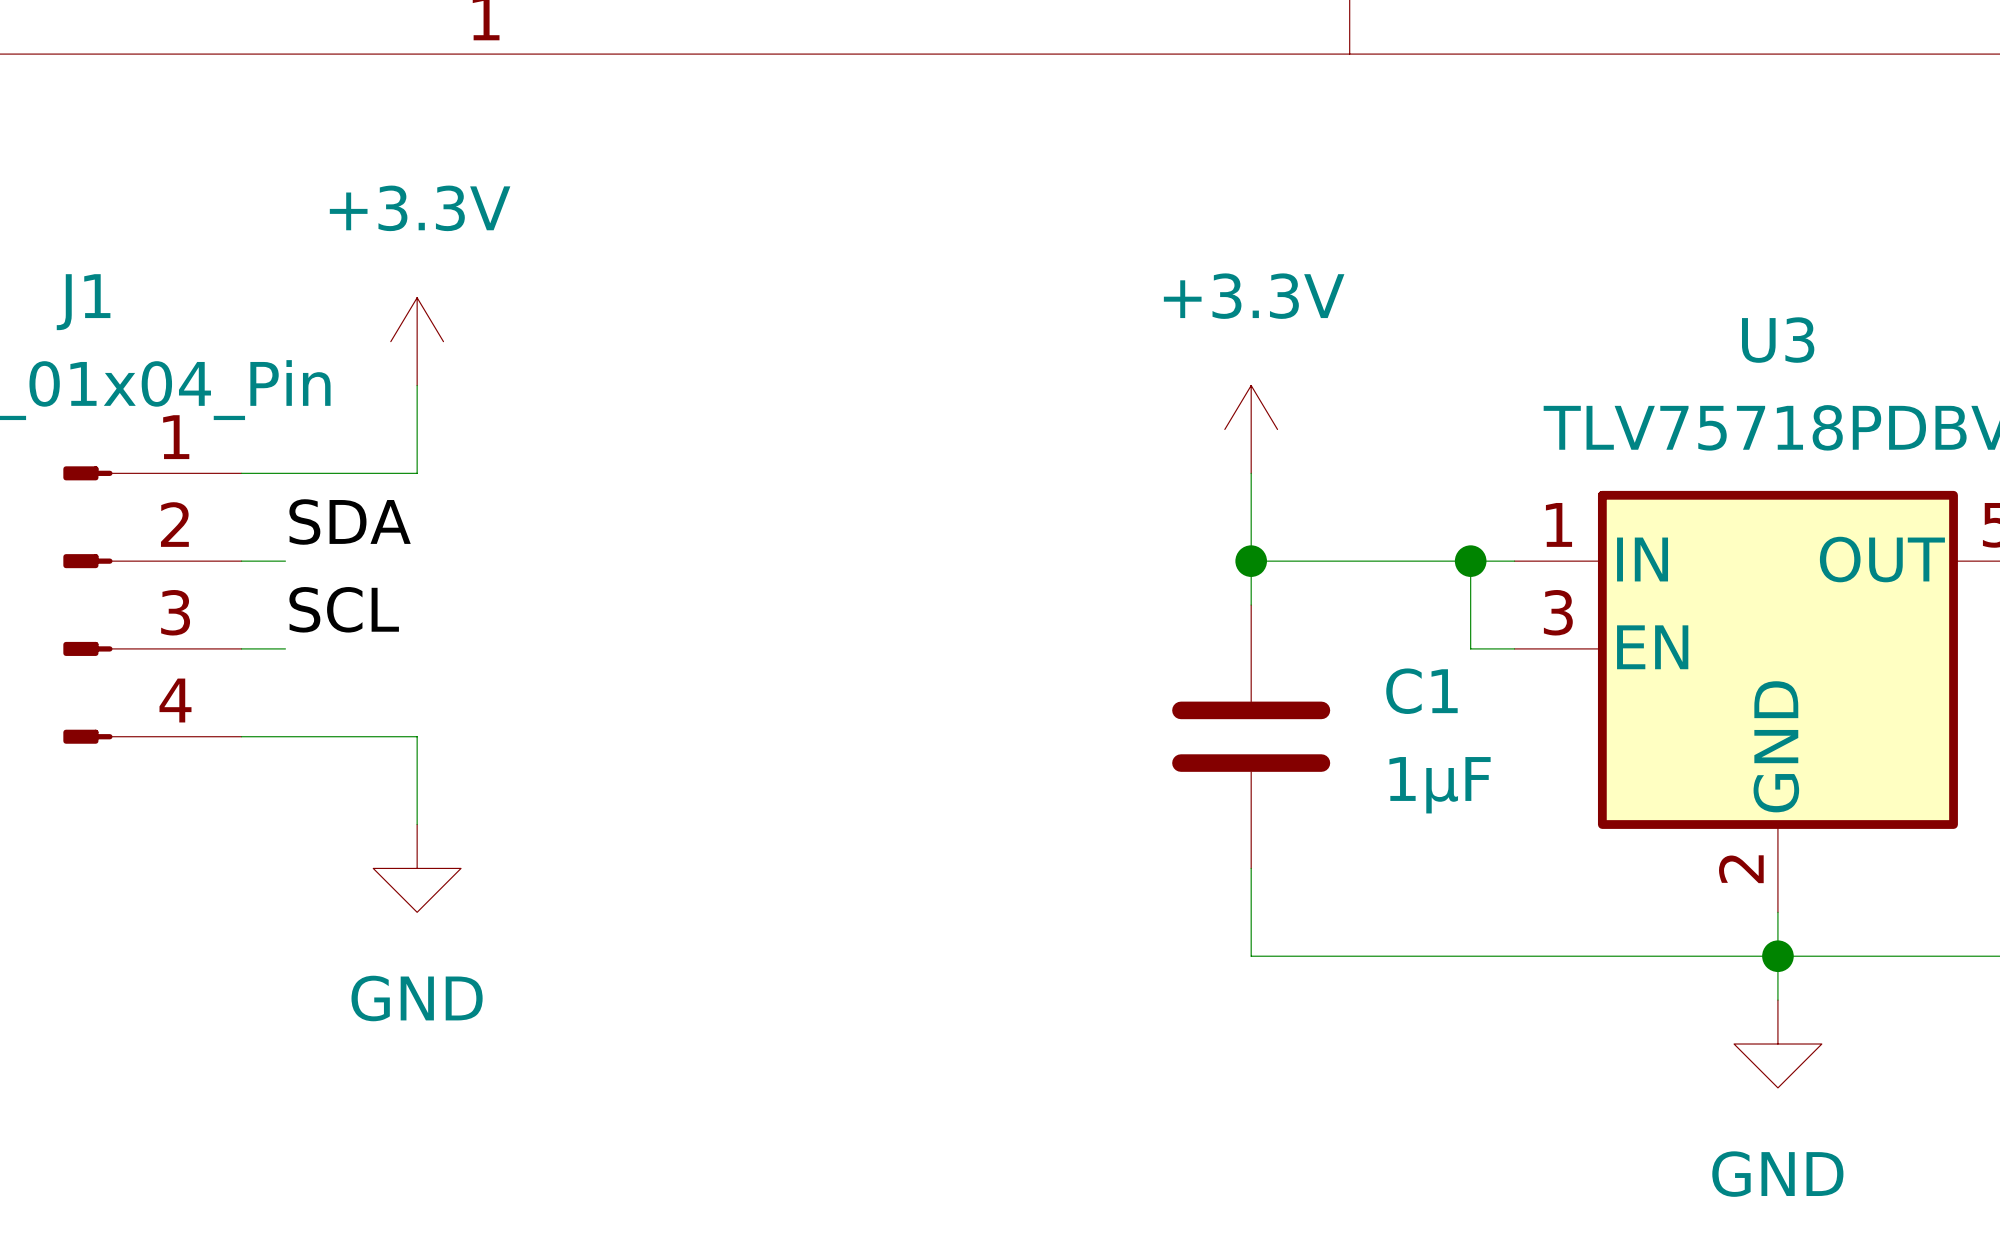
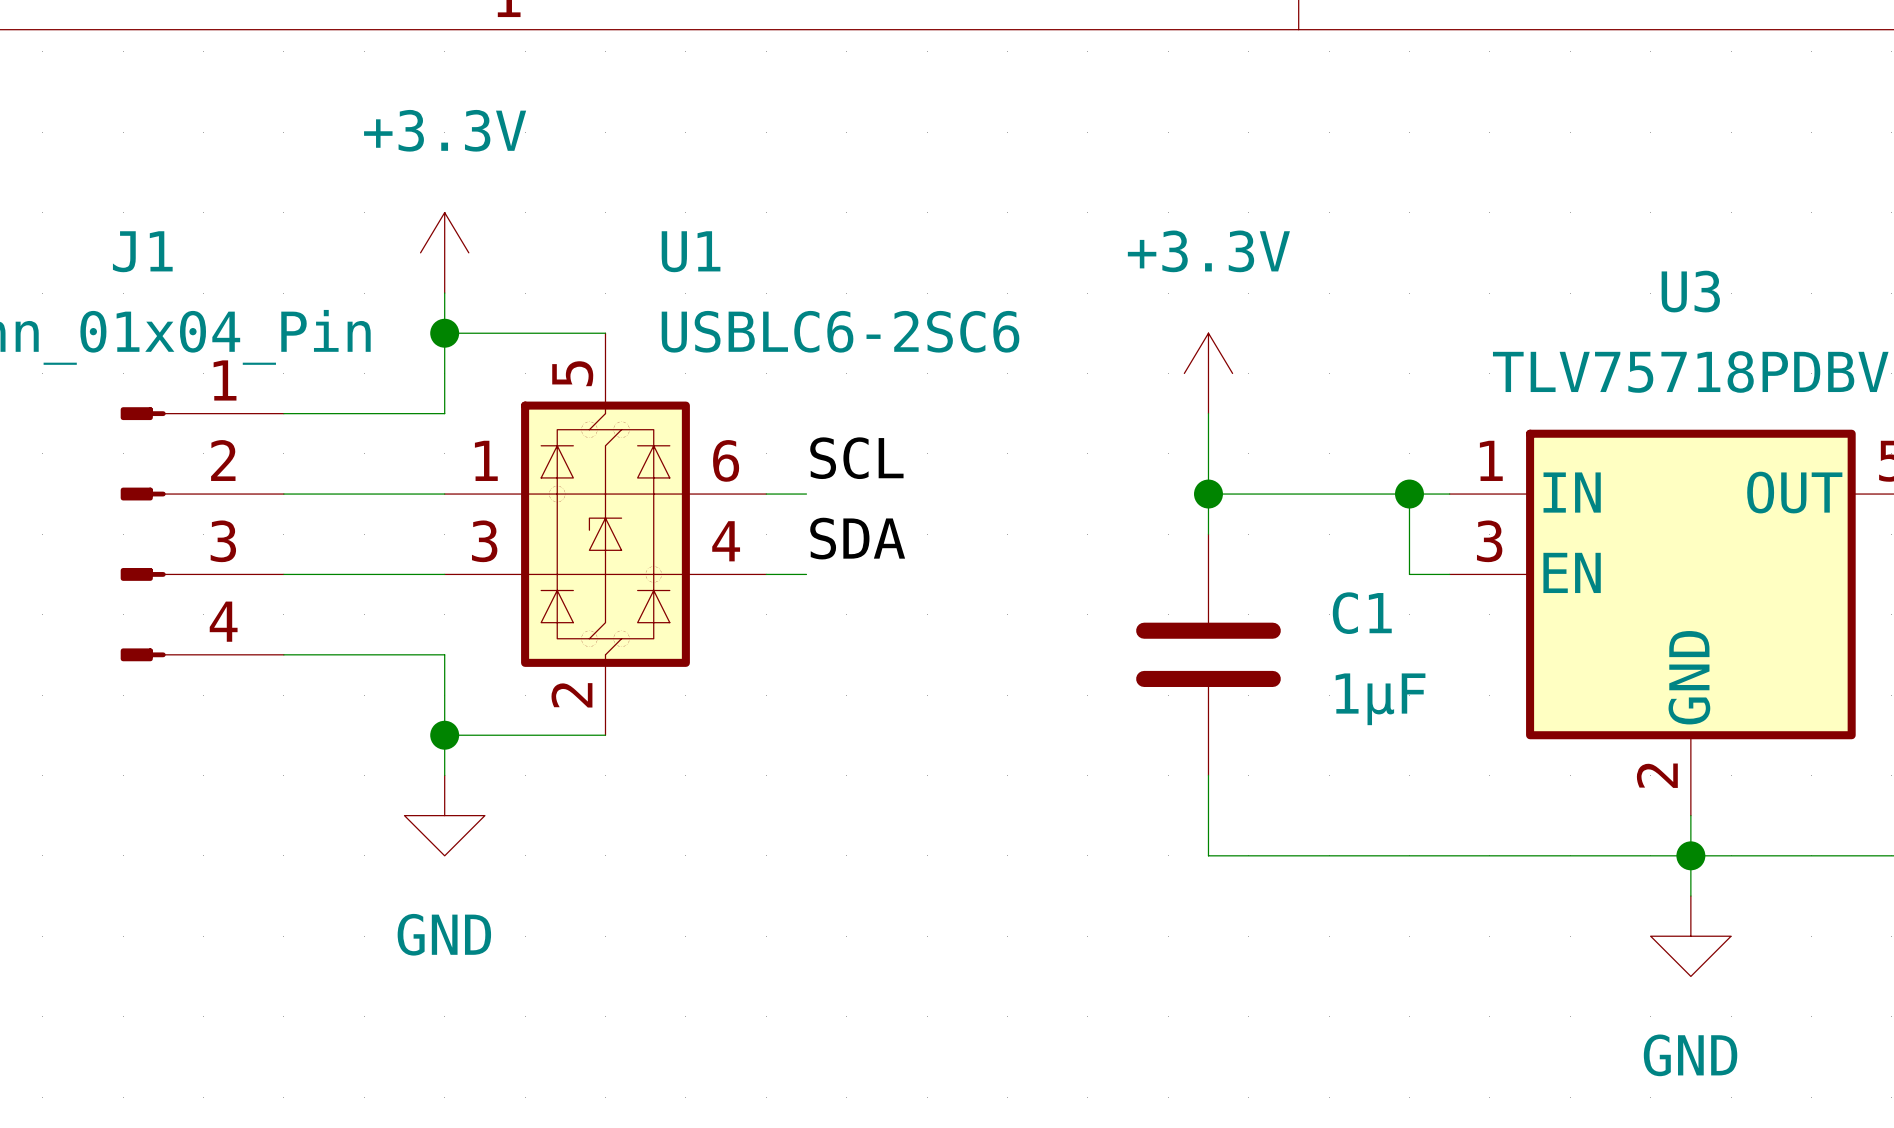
wire: none -> (444, 293) (444, 333) (605, 333)
power symbol position: +3.3V (417, 341) -> +3.3V (444, 252)
junction: none -> (444, 333)
label position: SDA (350, 522) -> SDA (857, 538)
wire: none -> (324, 494) (444, 494)
wire: none -> (766, 494) (806, 494)
U1: none -> USBLC6-2SC6 (605, 534)
label position: SCL (344, 609) -> SCL (856, 458)
wire: none -> (324, 574) (444, 574)
wire: none -> (766, 574) (806, 574)
junction: none -> (444, 735)
wire: none -> (605, 735) (444, 735) (444, 775)
power symbol position: GND (417, 868) -> GND (444, 815)

